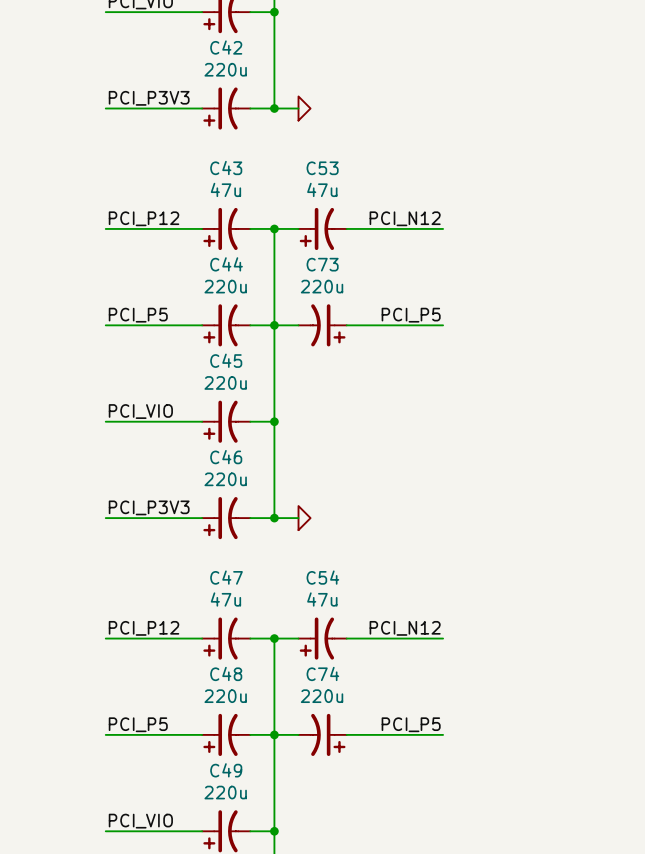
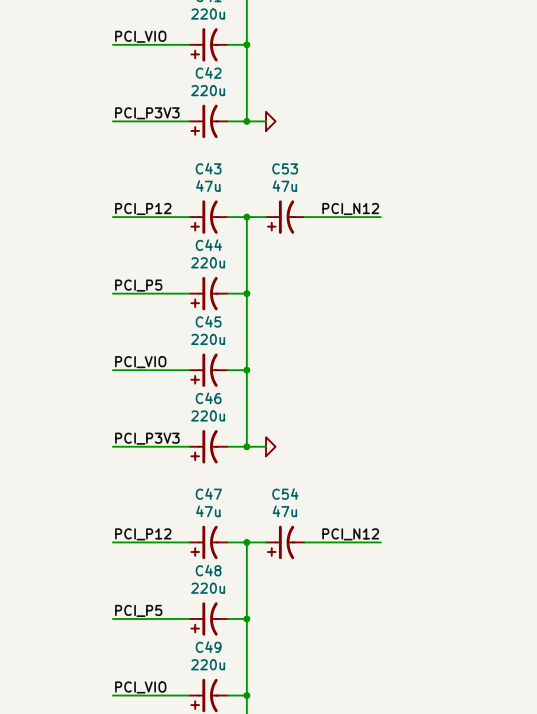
label: PCI_P5 (411, 315) -> none
wire: (274, 325) (298, 325) -> none
C73: 220u (322, 325) -> none
wire: (346, 325) (443, 325) -> none
label: PCI_P5 (411, 724) -> none
wire: (274, 734) (298, 734) -> none
C74: 220u (322, 734) -> none
wire: (346, 734) (443, 734) -> none

